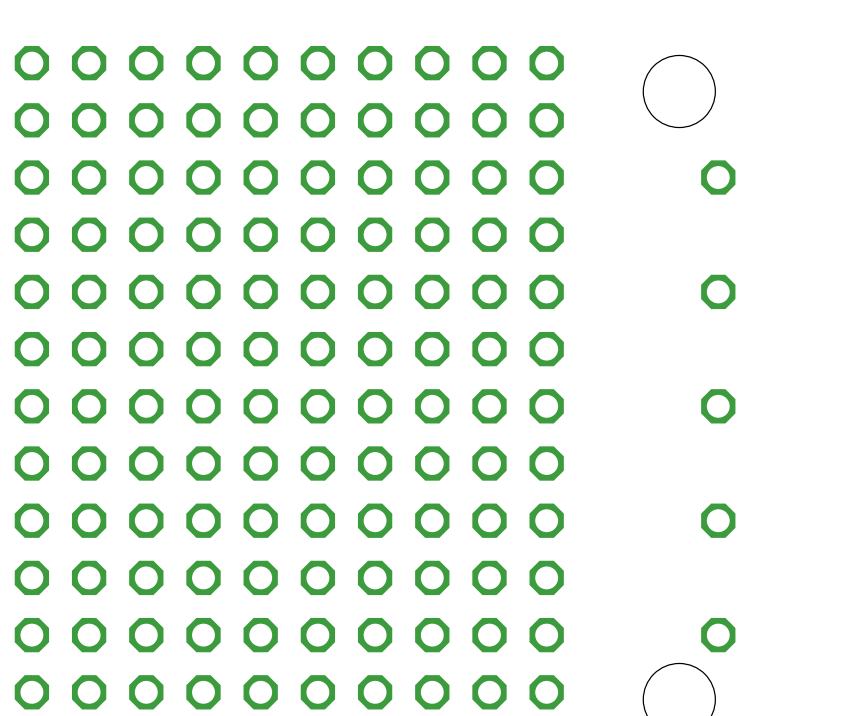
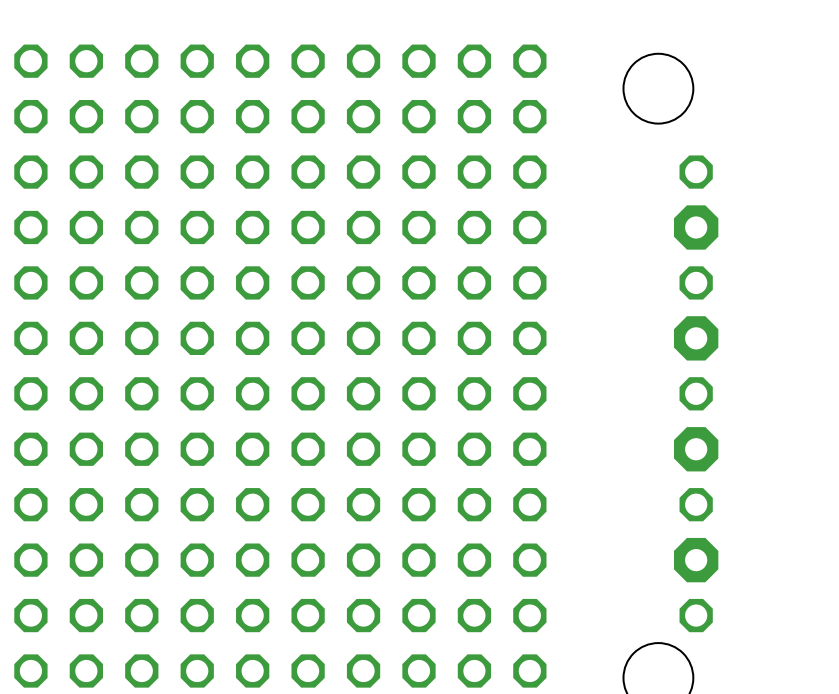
part: none -> (696, 227)
part: none -> (696, 338)
part: none -> (696, 449)
part: none -> (696, 560)

